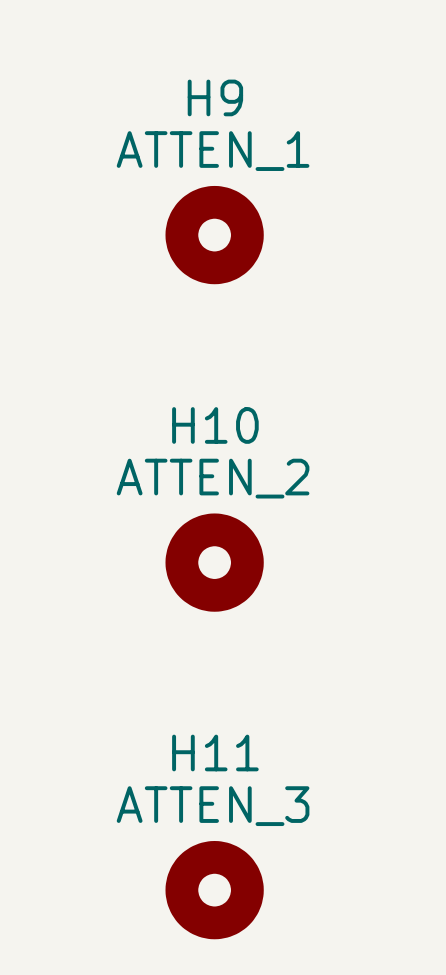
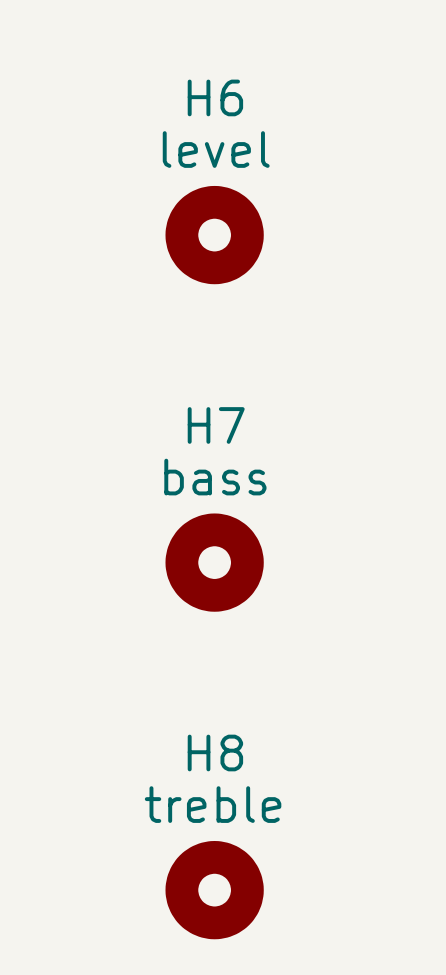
H9 name: H9 (215, 97) -> H6 (215, 97)
H9 value: ATTEN_1 (213, 151) -> level (216, 149)
H10 name: H10 (215, 425) -> H7 (216, 425)
H10 value: ATTEN_2 (213, 478) -> bass (215, 477)
H11 name: H11 (215, 752) -> H8 (215, 752)
H11 value: ATTEN_3 (213, 806) -> treble (213, 804)

